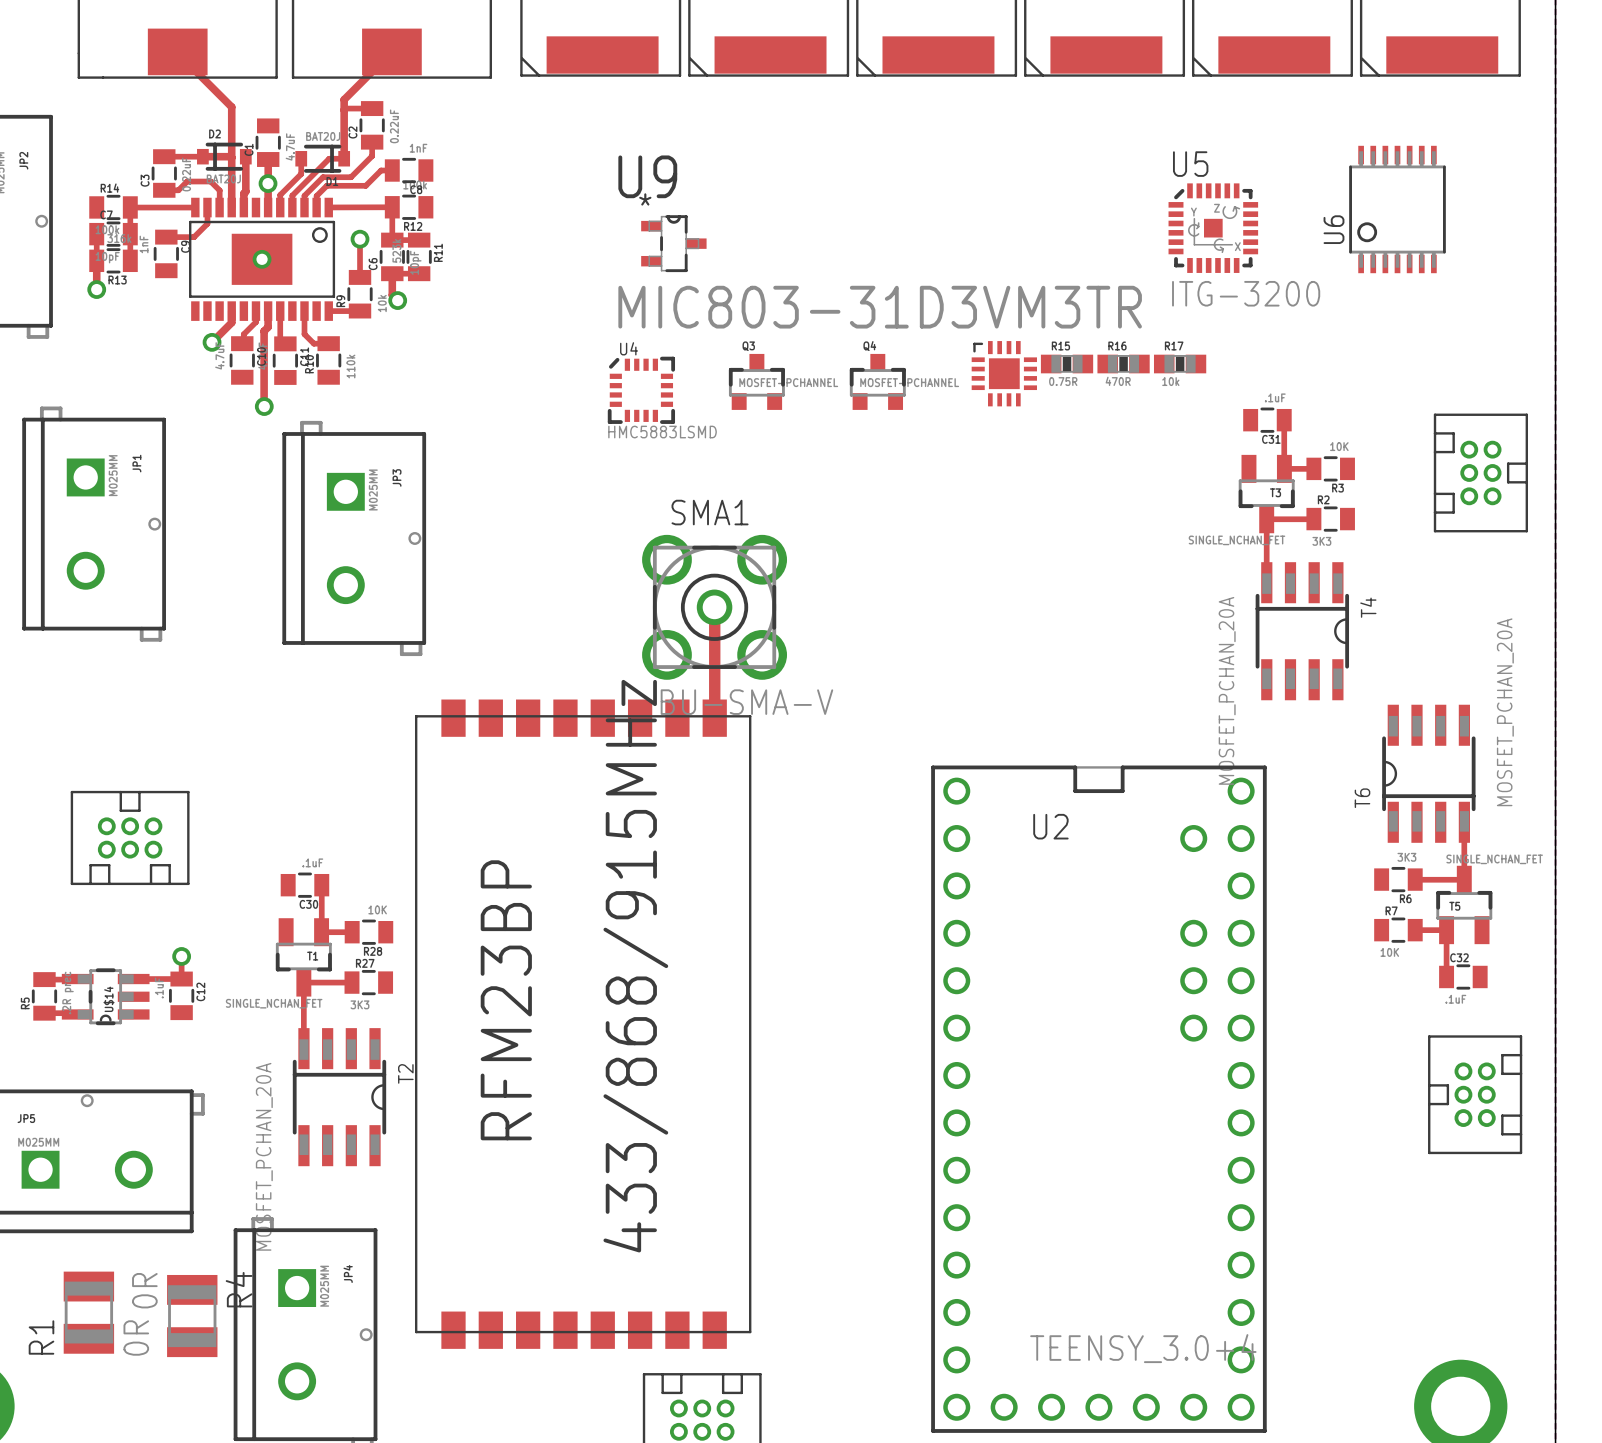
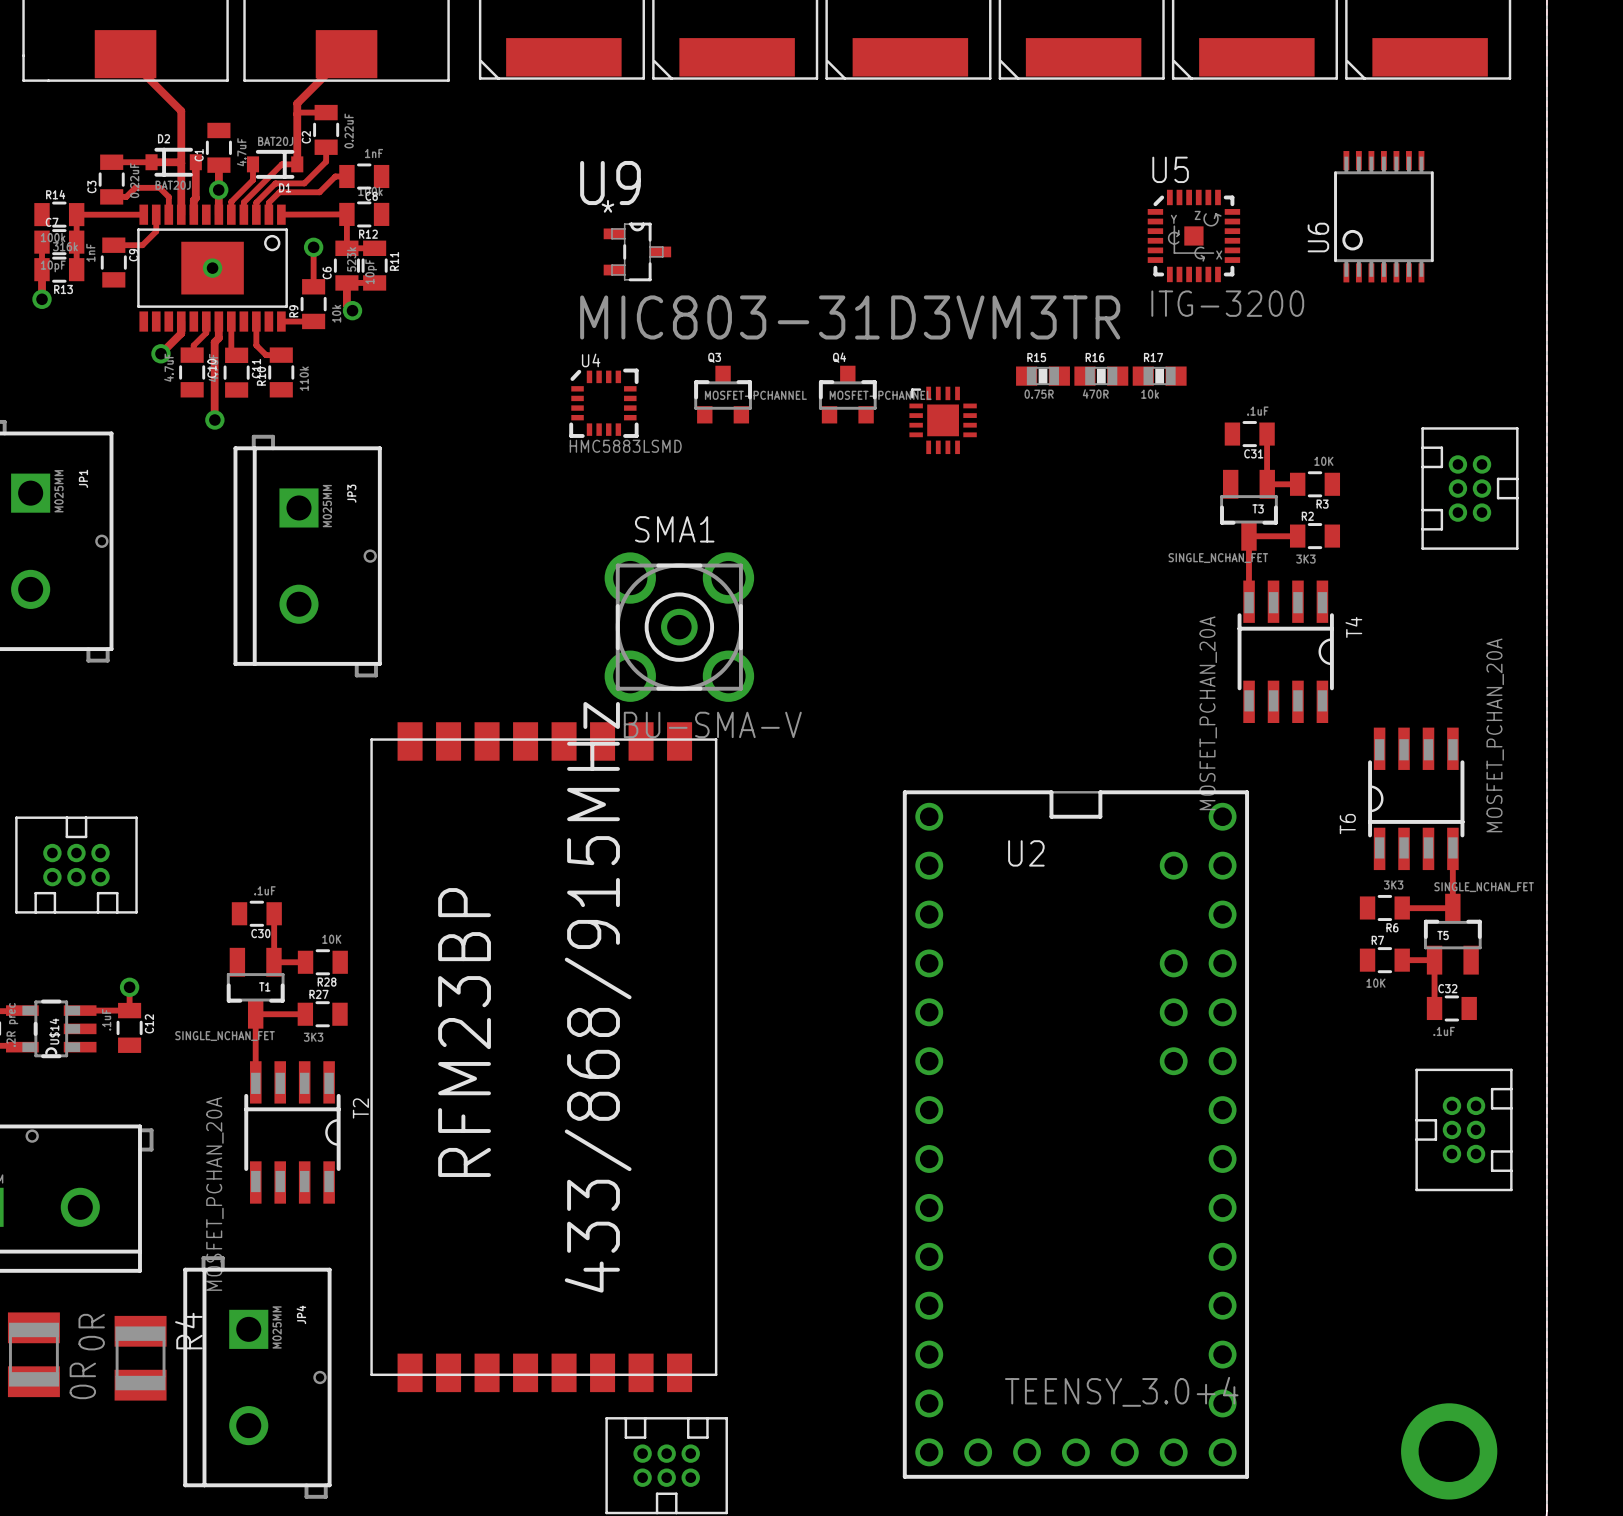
part position: (1004, 373) -> (943, 420)
top track: (714, 607) (714, 718) -> none

